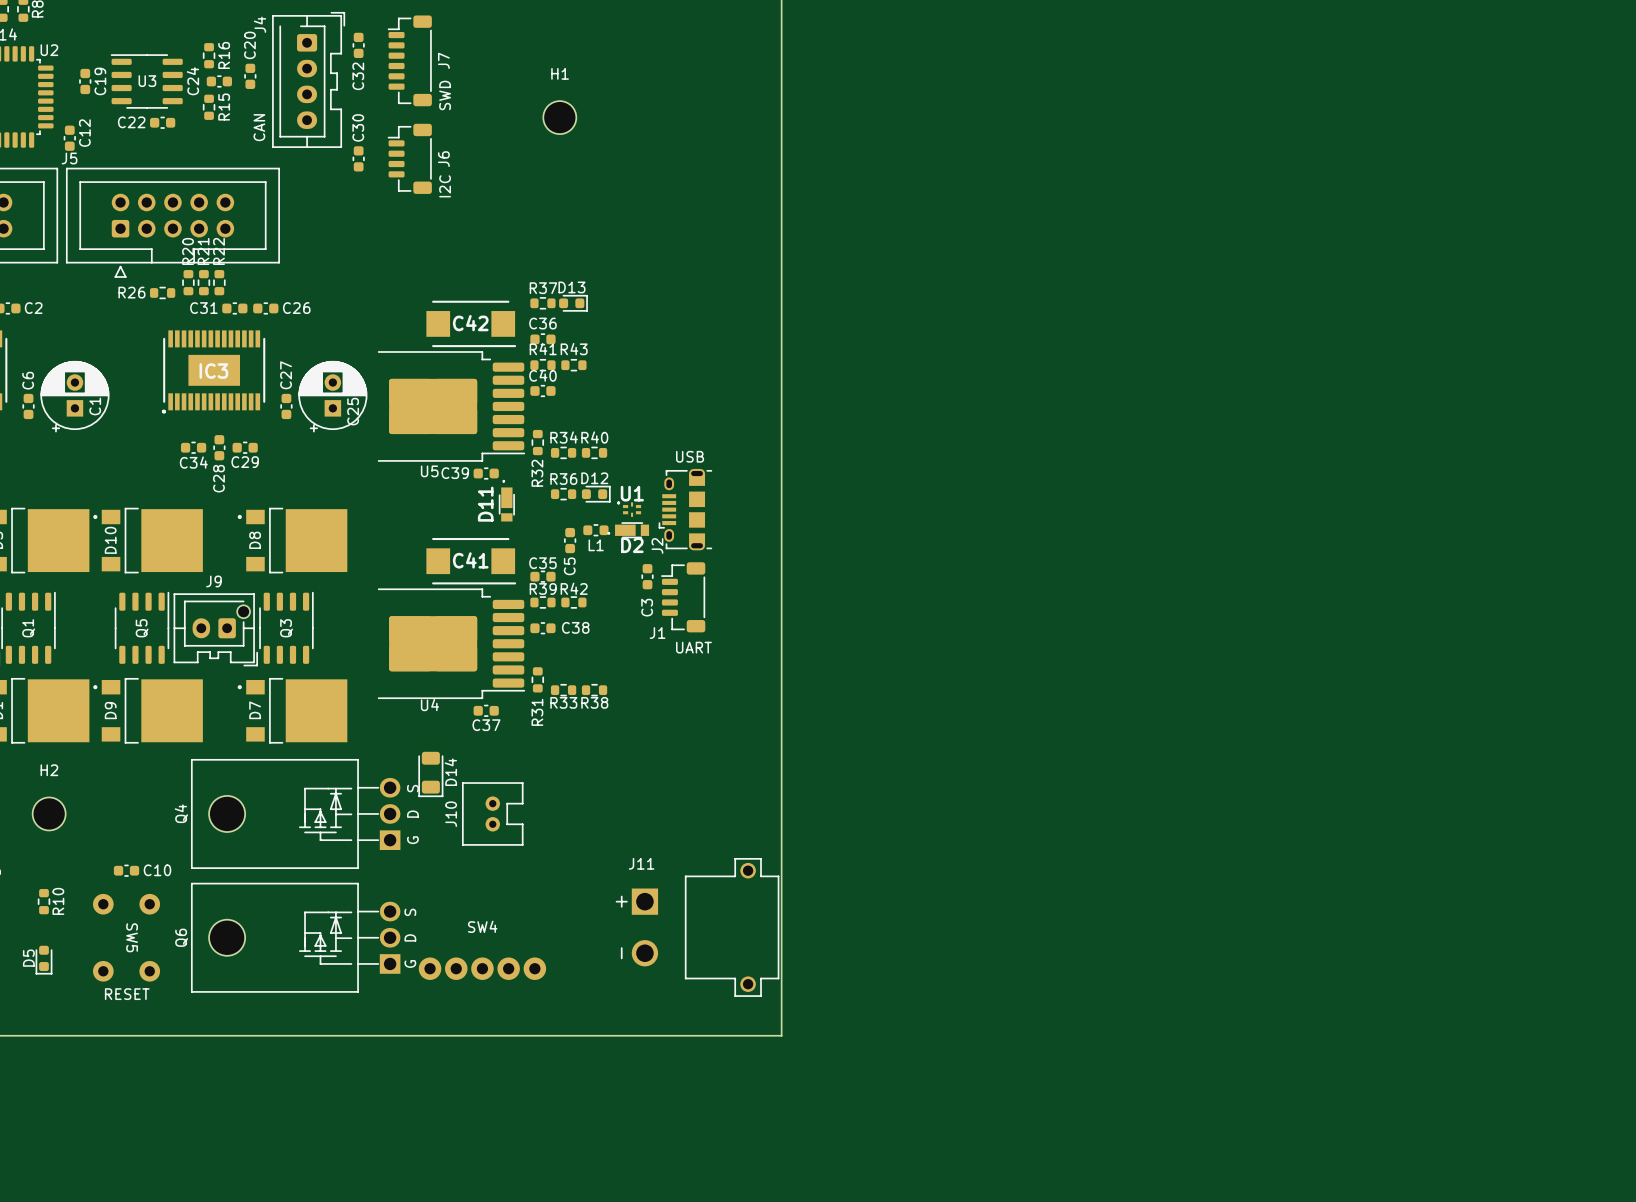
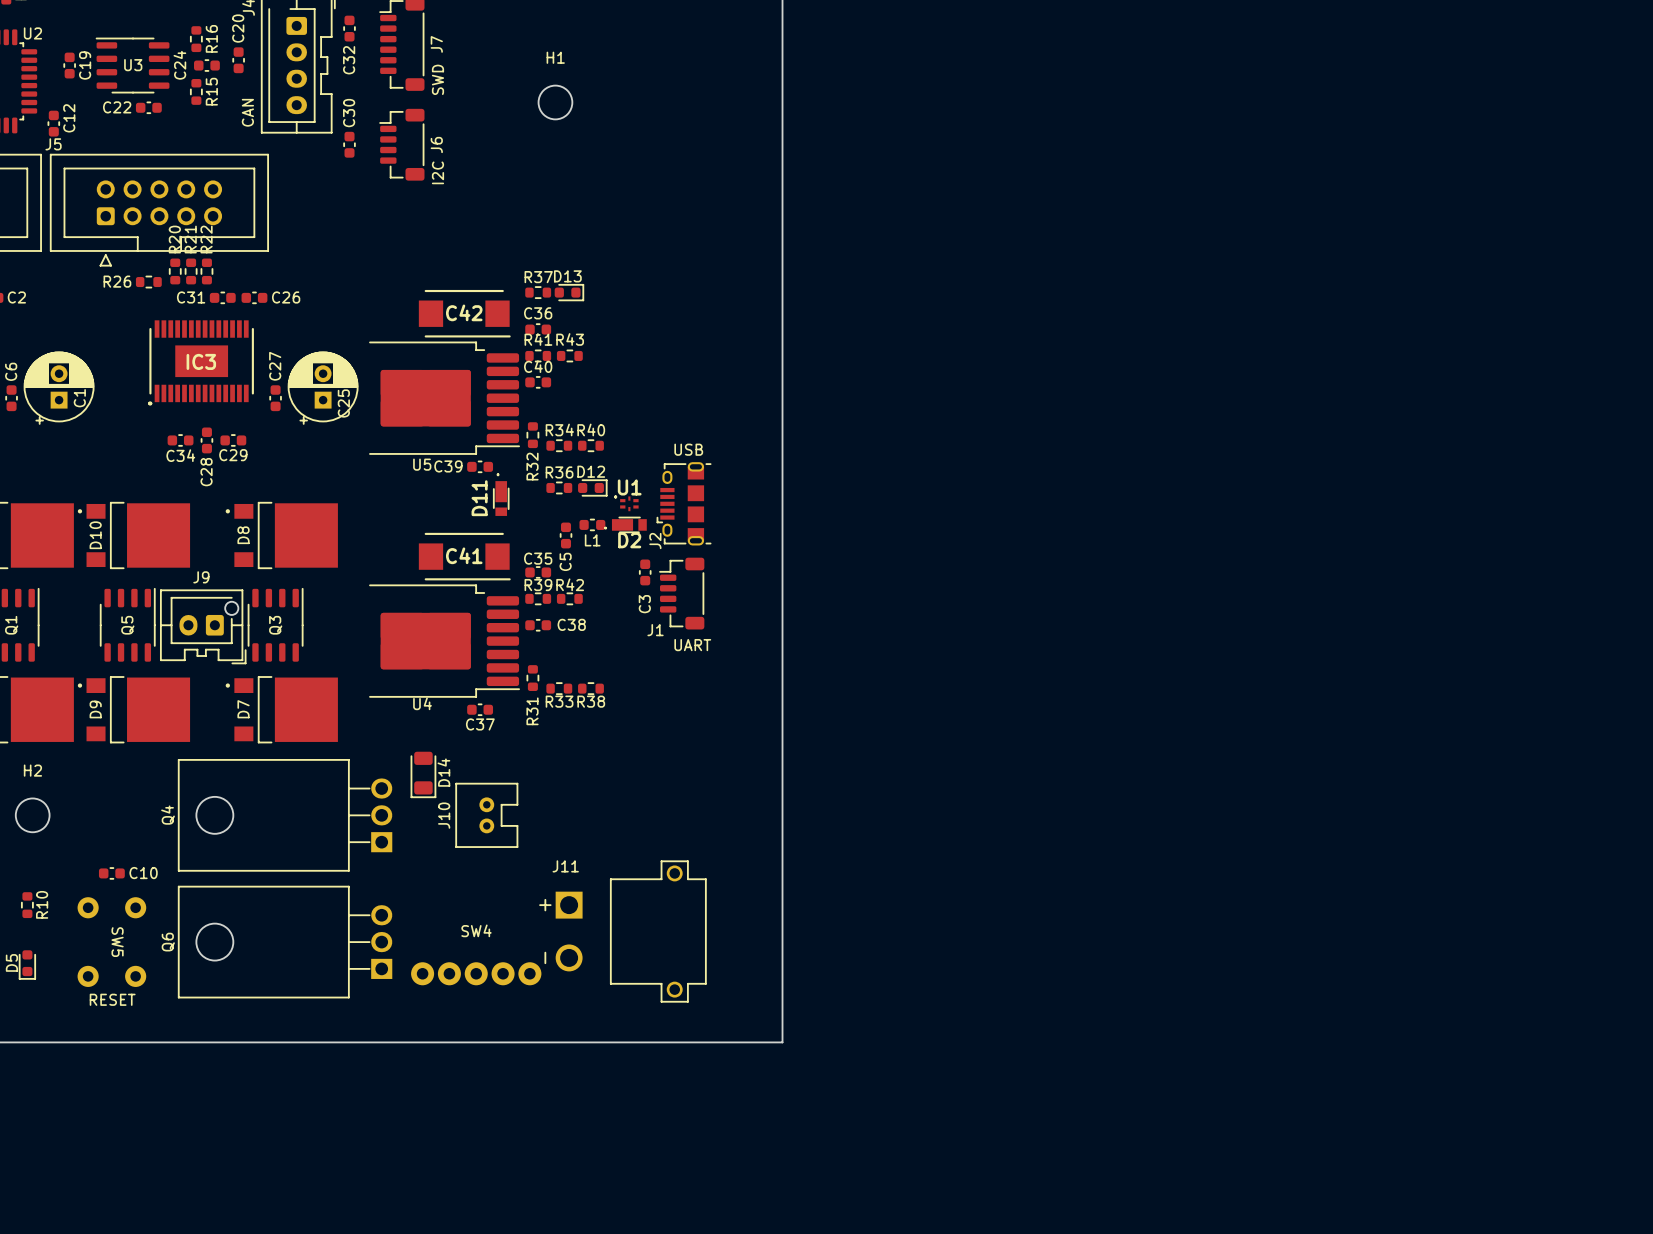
Q4 footprint: [191, 759, 401, 869] -> [178, 759, 393, 872]
Q6 footprint: [191, 882, 401, 993] -> [178, 886, 393, 999]
J11 position: (697, 927) -> (622, 931)

